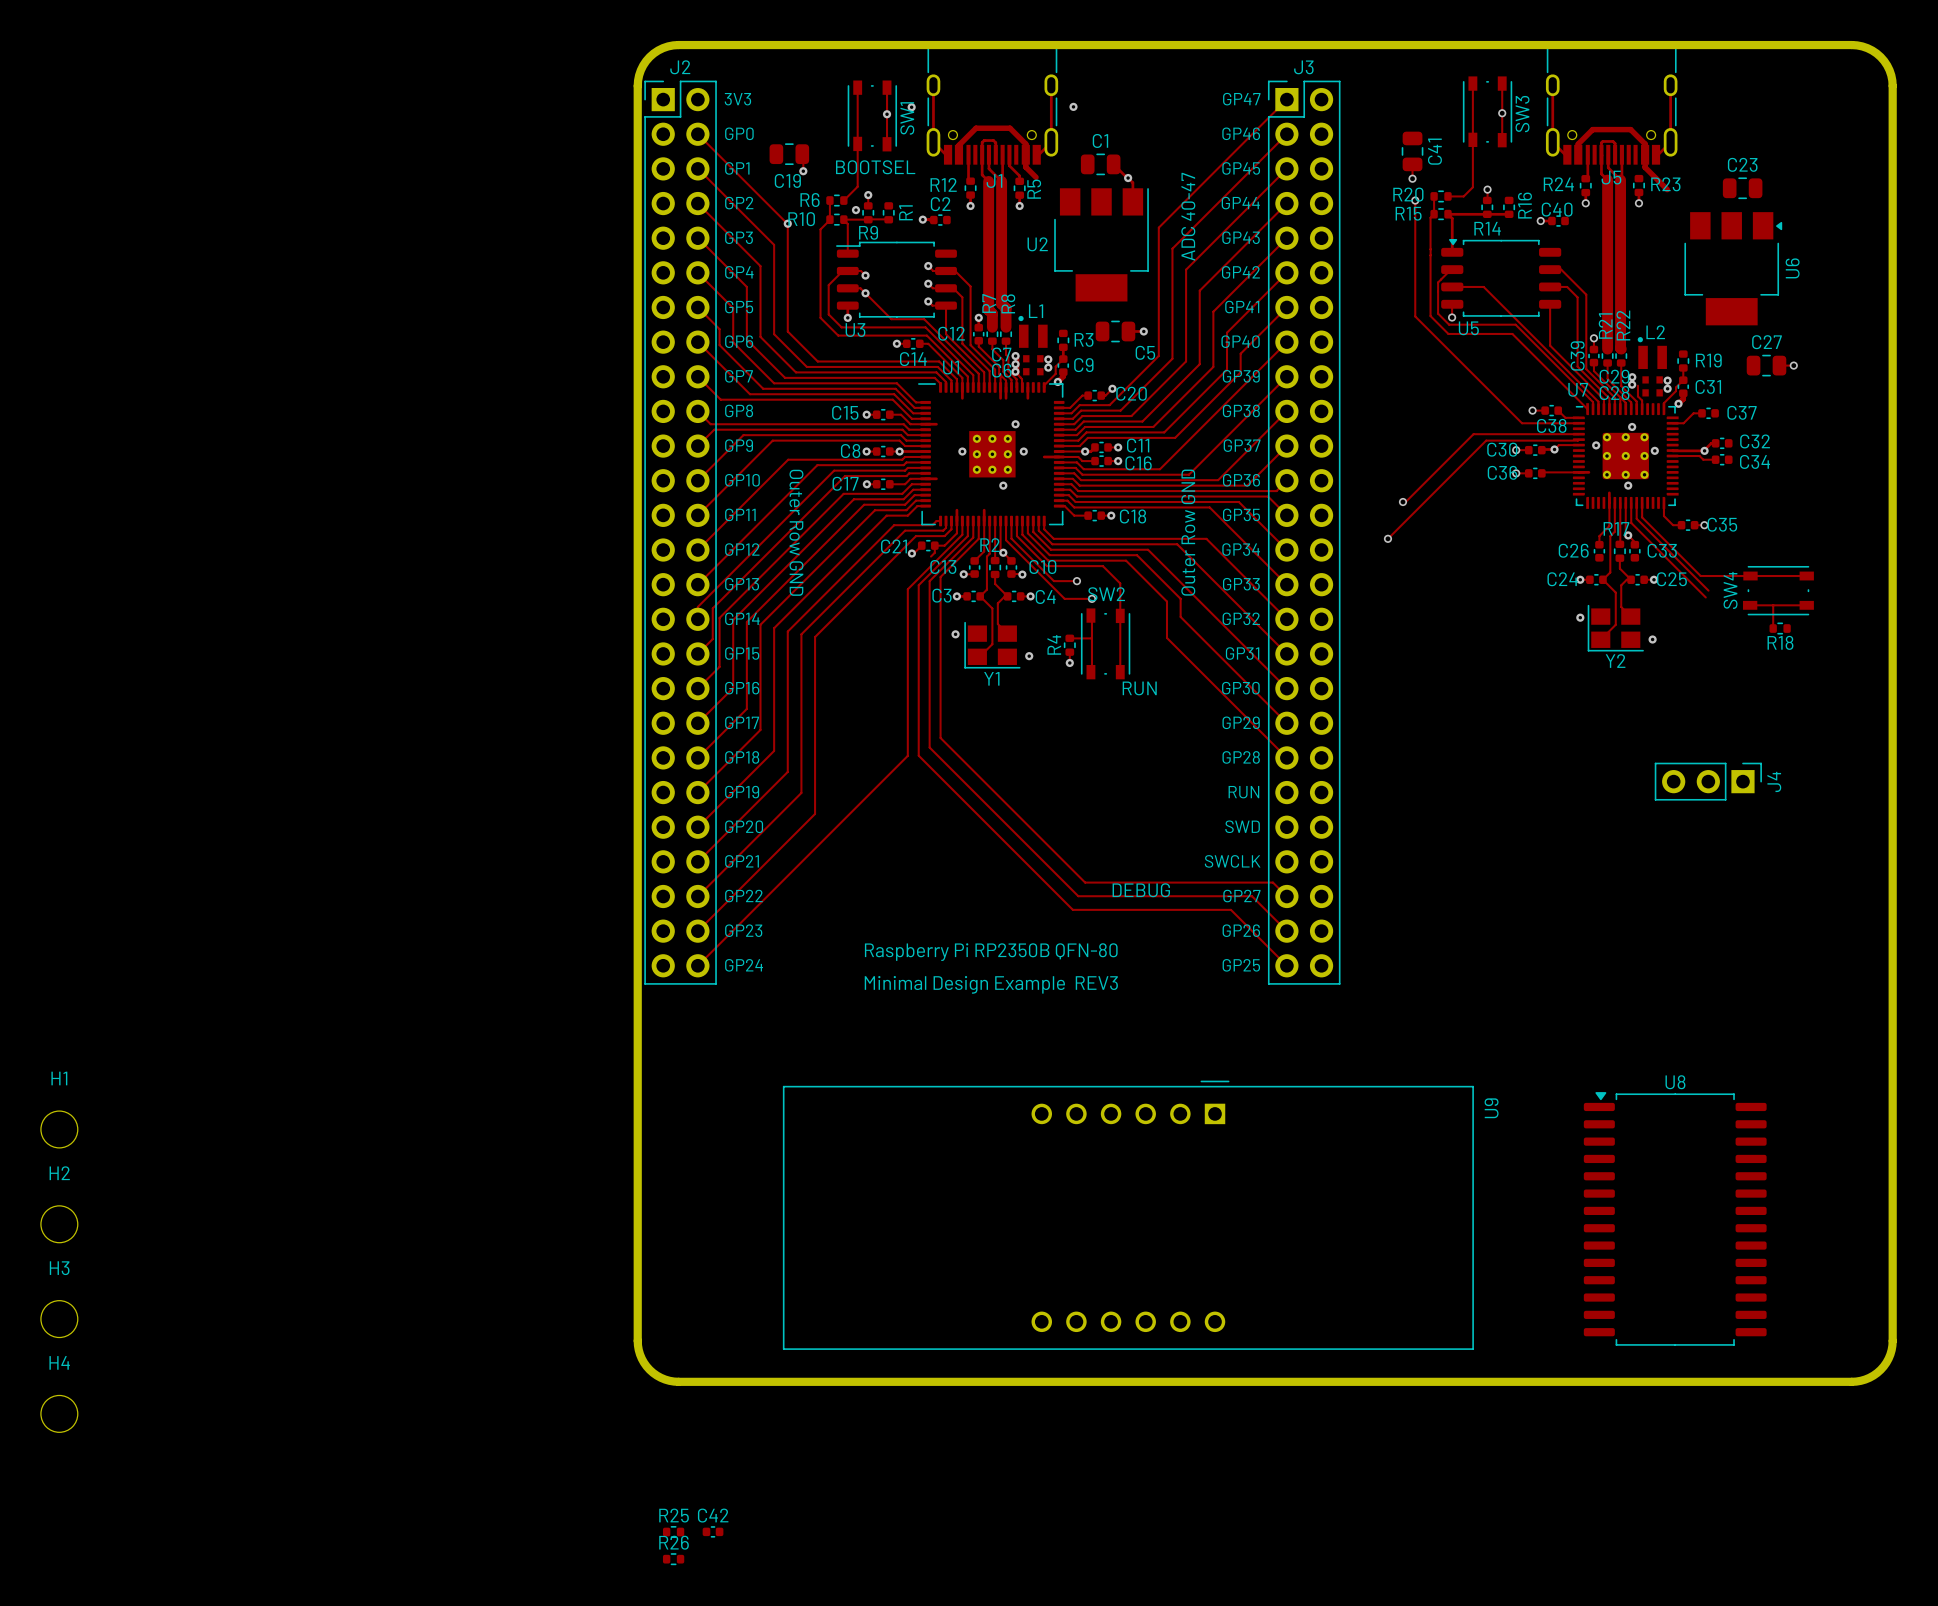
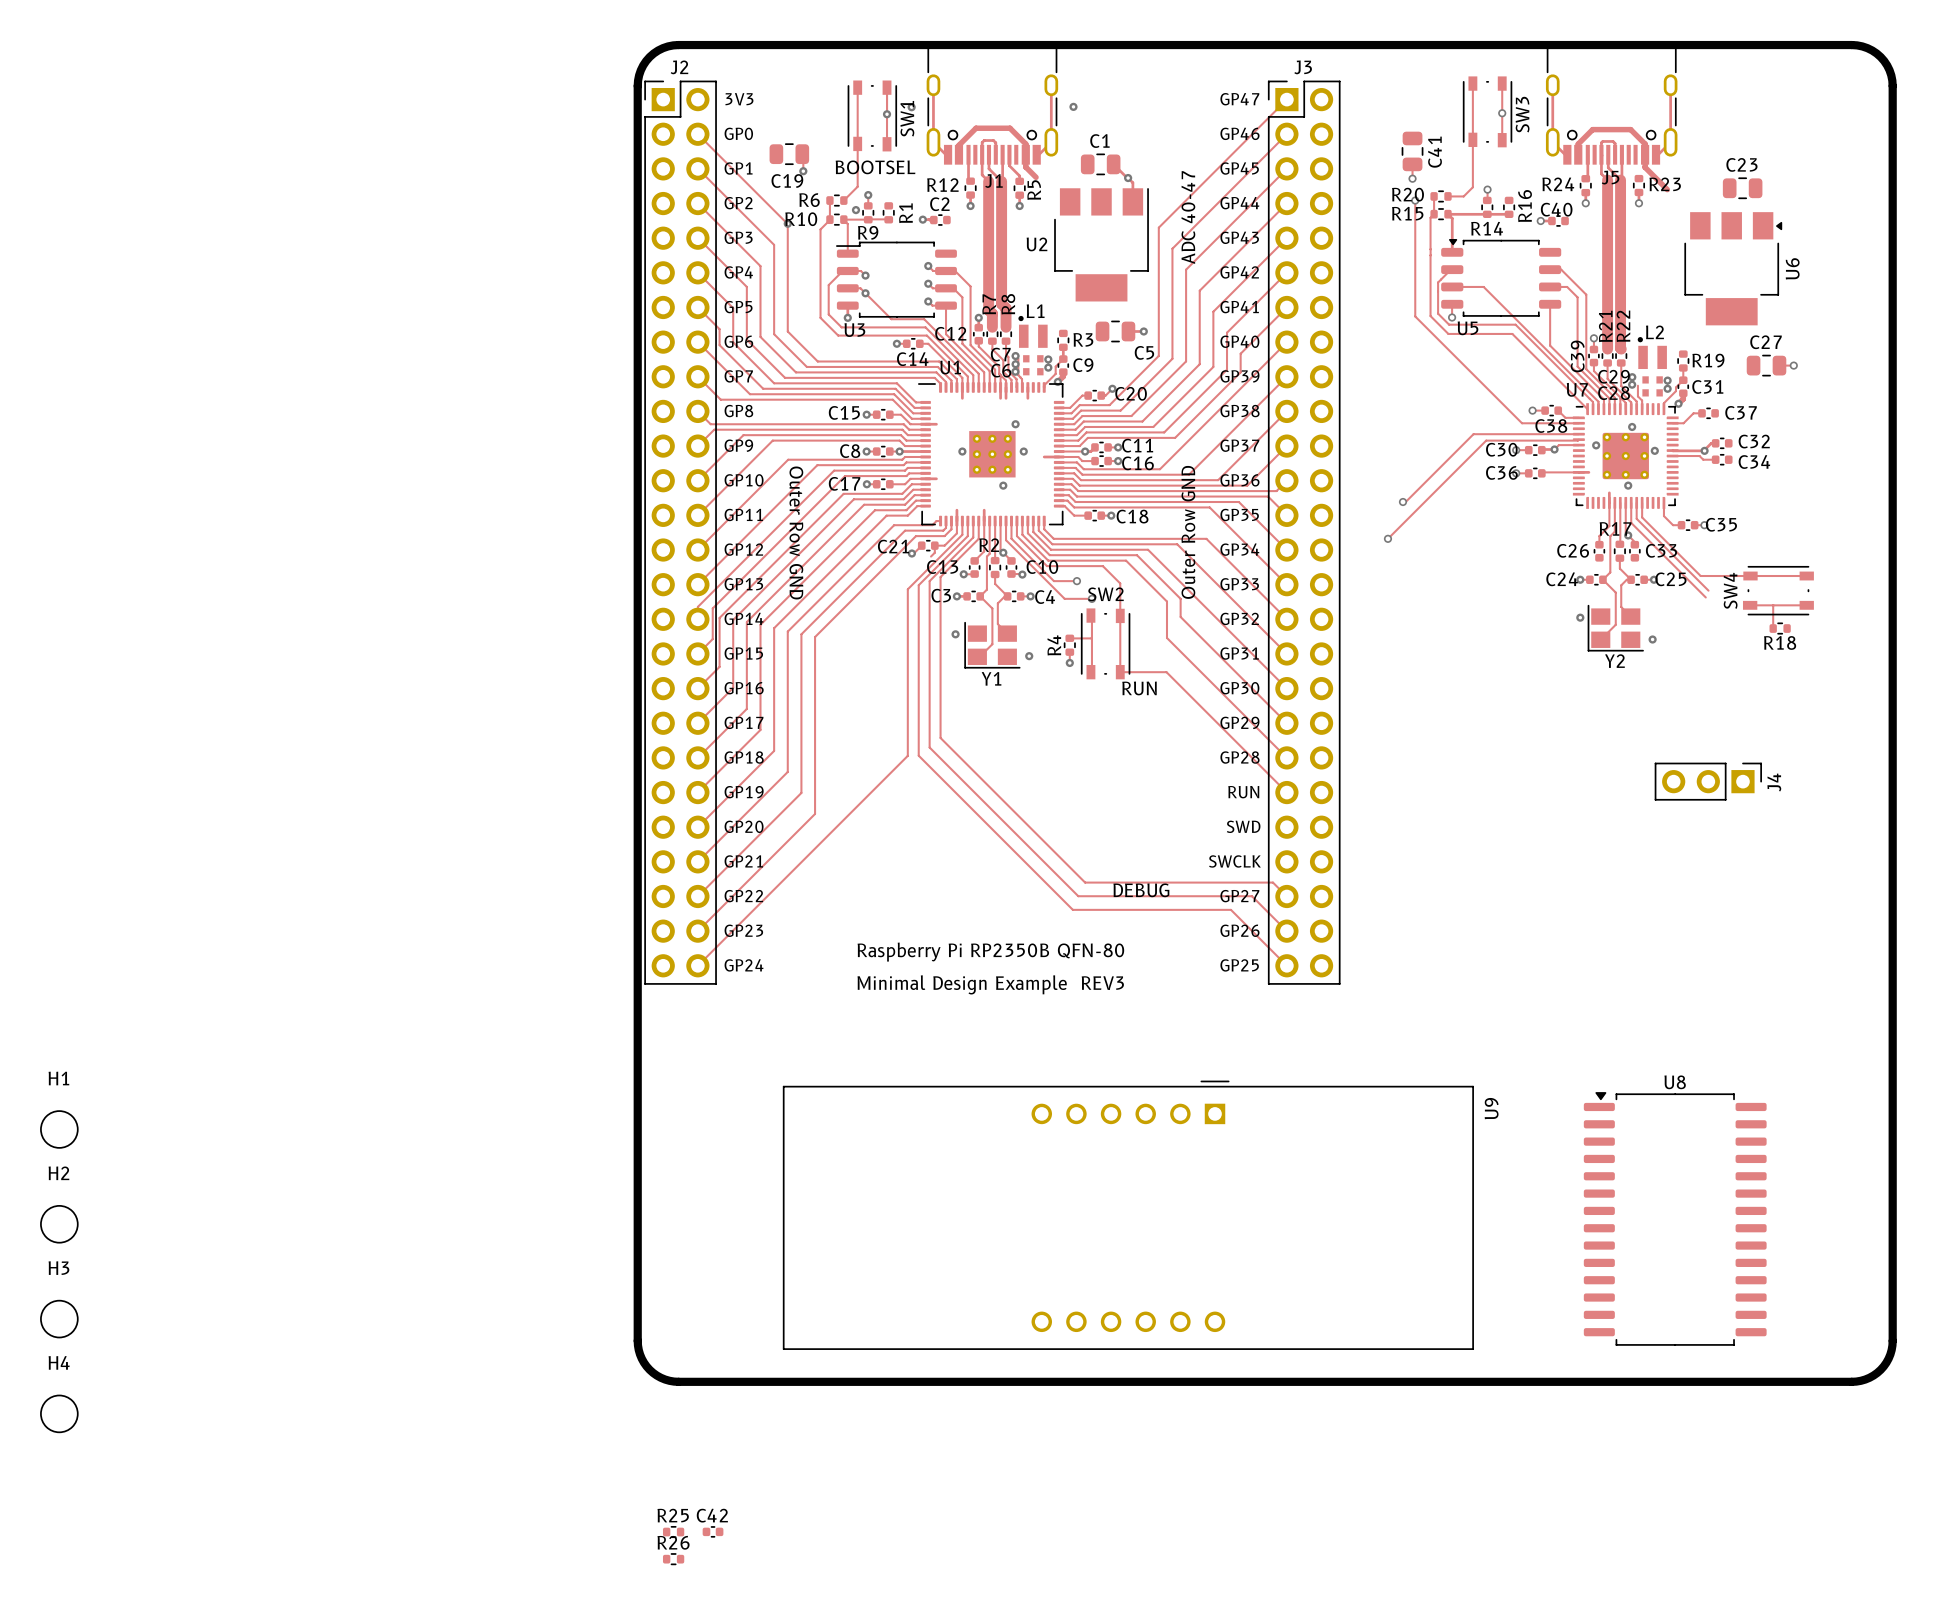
track: none -> (1120, 672) (1166, 672) (1286, 792)

